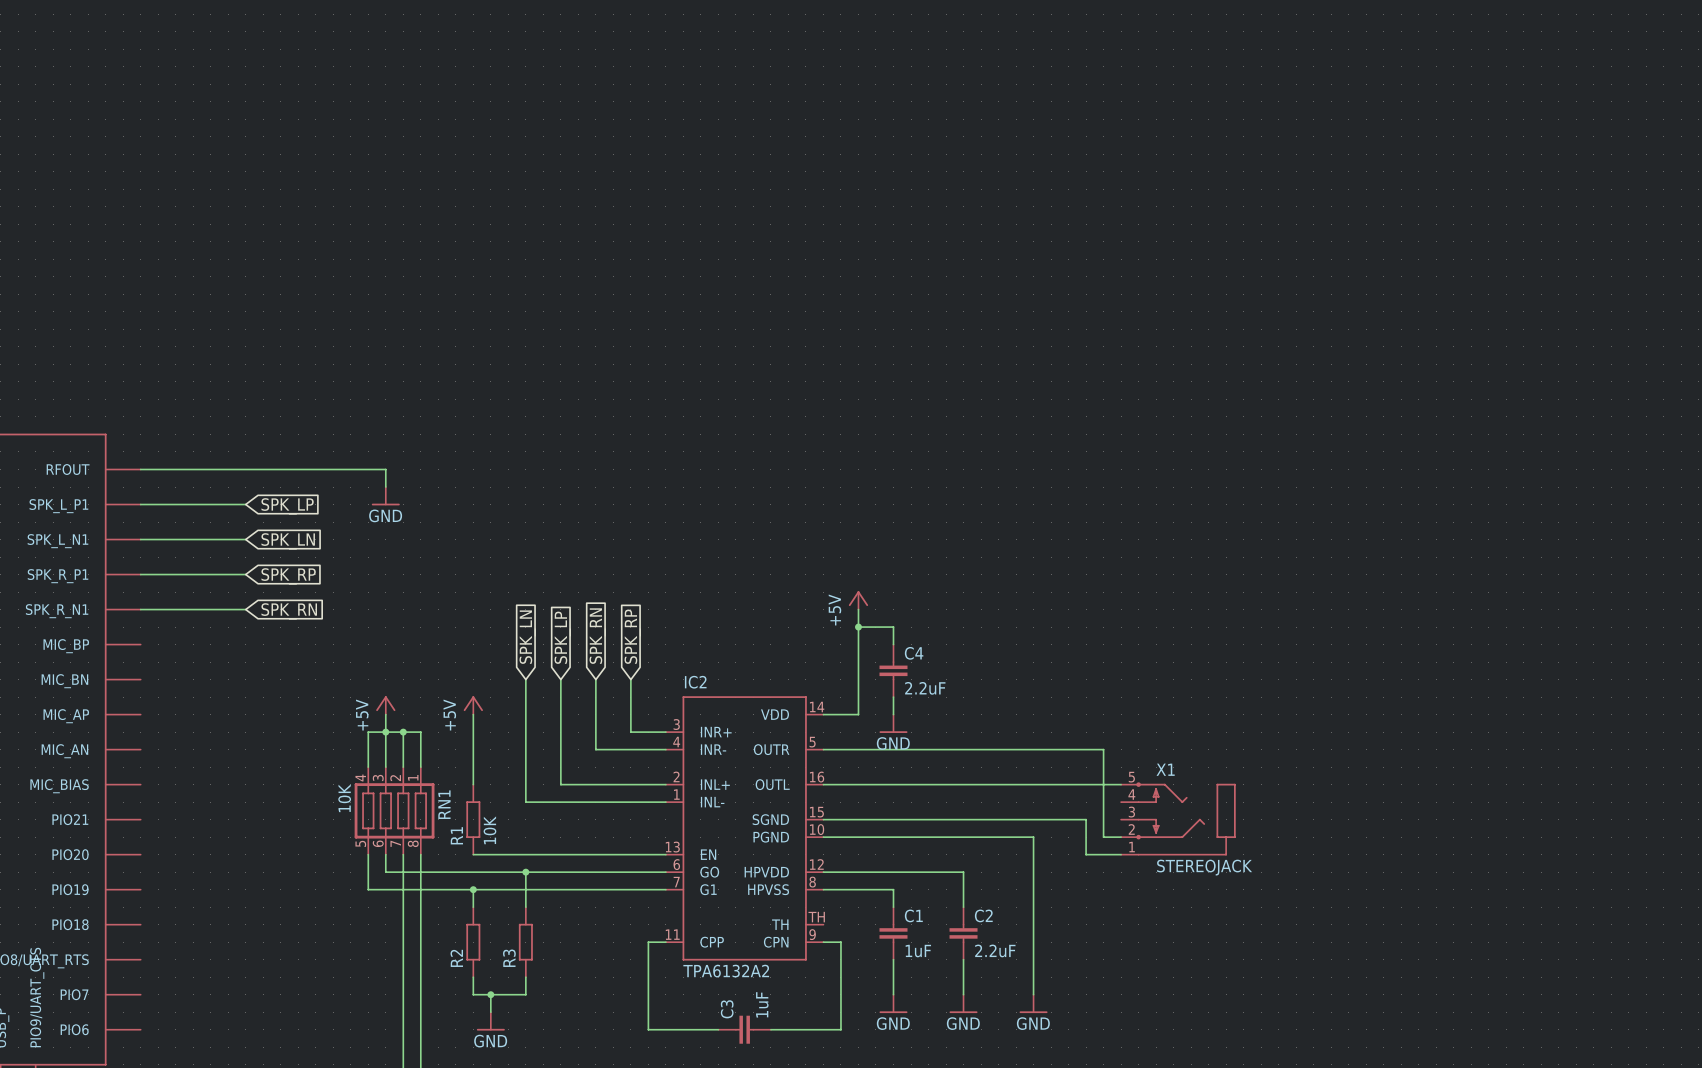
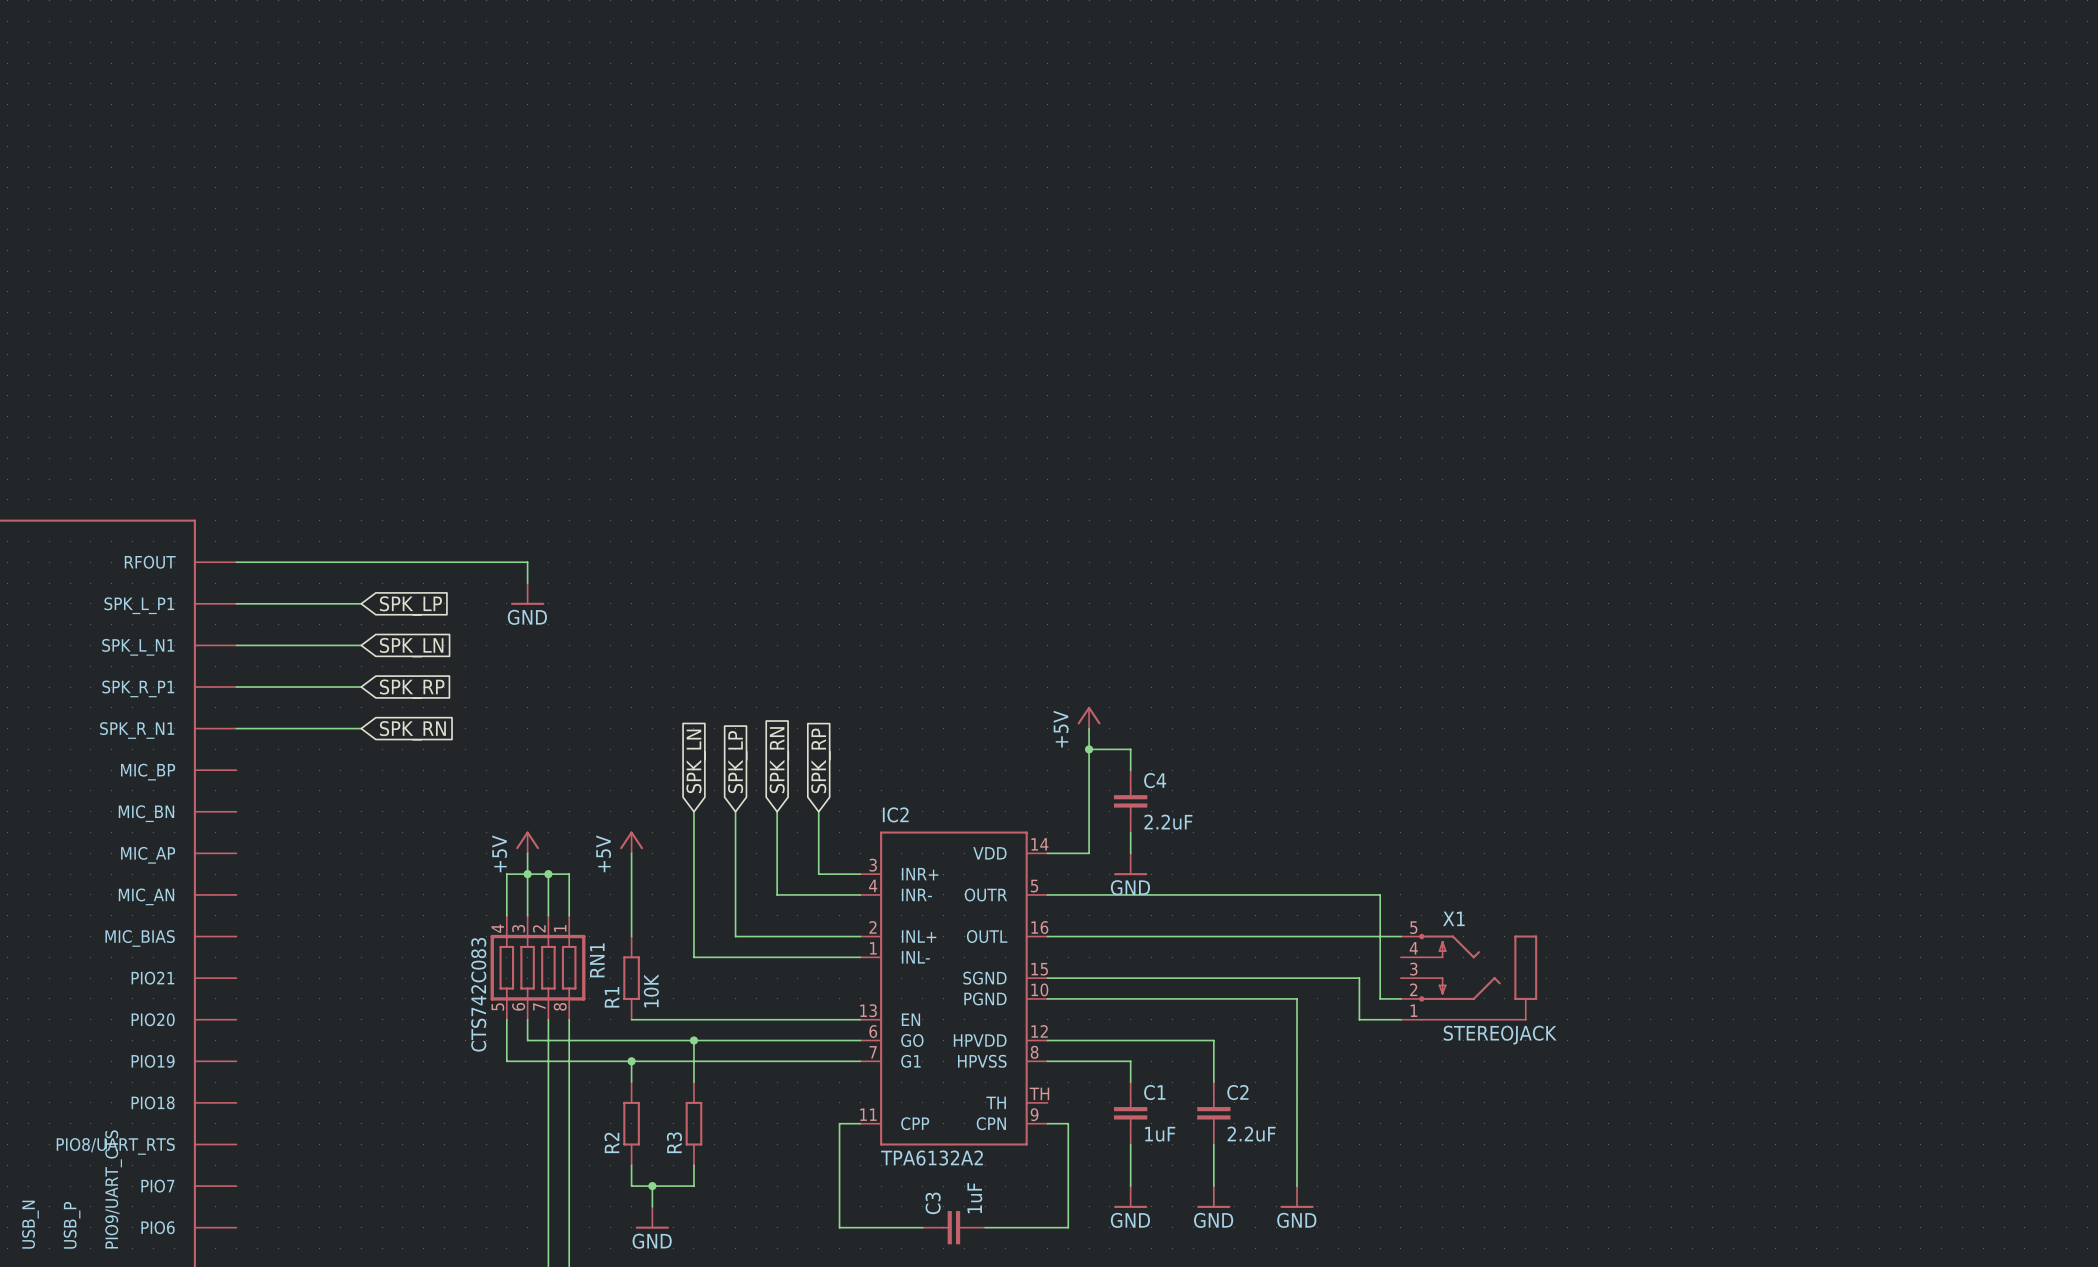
RN1 value: 10K (344, 798) -> CTS742C083 (478, 994)

